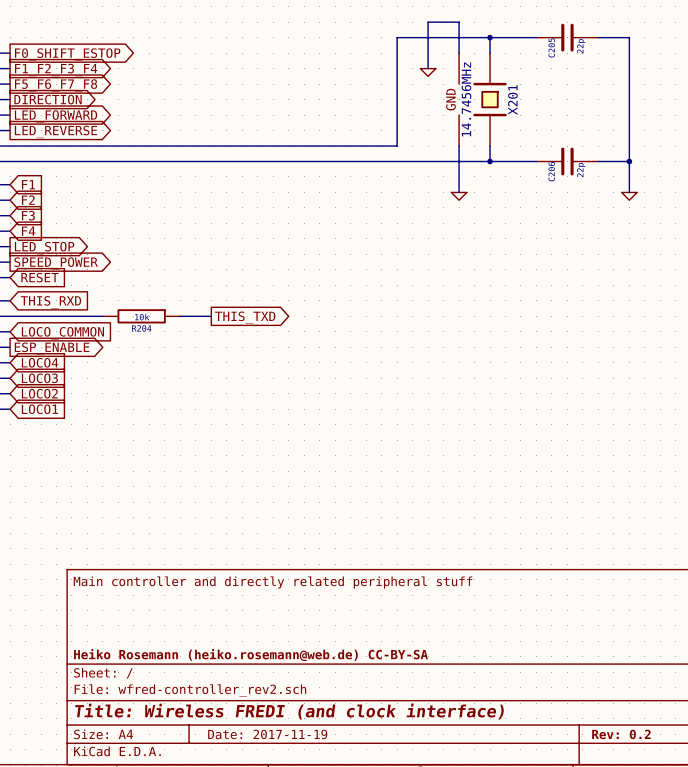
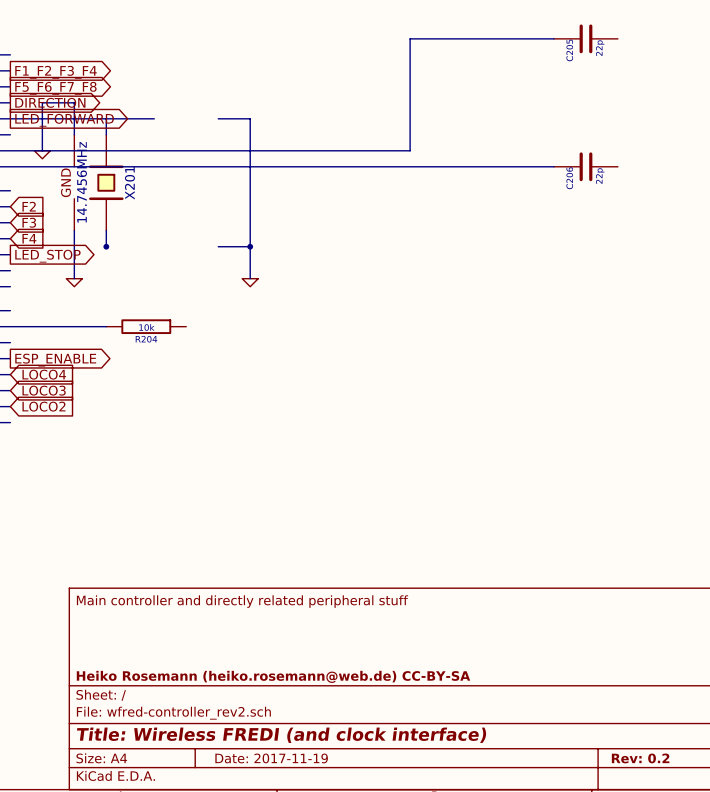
wire: (490, 37) (490, 53) -> none
junction: (490, 37) -> none
wire: (598, 37) (629, 37) (629, 192) -> none
wire: (459, 53) (459, 22) (428, 22) (428, 68) -> none
global label: F0_SHIFT_ESTOP (67, 54) -> none
power symbol: (428, 72) -> none
X201 position: (482, 99) -> (98, 182)
wire: none -> (10, 118) (154, 118)
wire: none -> (106, 118) (106, 134)
wire: none -> (218, 118) (250, 118) (250, 278)
wire: none -> (74, 134) (74, 102) (42, 102) (42, 150)
global label: LED_REVERSE (55, 131) -> none
wire: (459, 146) (459, 192) -> none
wire: (490, 146) (490, 161) -> none
power symbol: none -> (42, 154)
junction: (490, 161) -> none
wire: (598, 161) (629, 161) -> none
junction: (629, 161) -> none
global label: F1 (28, 184) -> none
power symbol: (459, 196) -> none
power symbol: (629, 196) -> none
wire: none -> (74, 230) (74, 278)
wire: none -> (106, 230) (106, 246)
junction: none -> (106, 246)
junction: none -> (250, 246)
global label: SPEED_POWER (56, 263) -> none
power symbol: none -> (74, 282)
power symbol: none -> (250, 282)
global label: RESET (39, 277) -> none
global label: THIS_RXD (50, 302) -> none
wire: (180, 316) (211, 316) -> (218, 246) (250, 246)
global label: THIS_TXD (245, 317) -> none
global label: LOCO_COMMON (62, 333) -> none
global label: LOCO1 (39, 409) -> none

